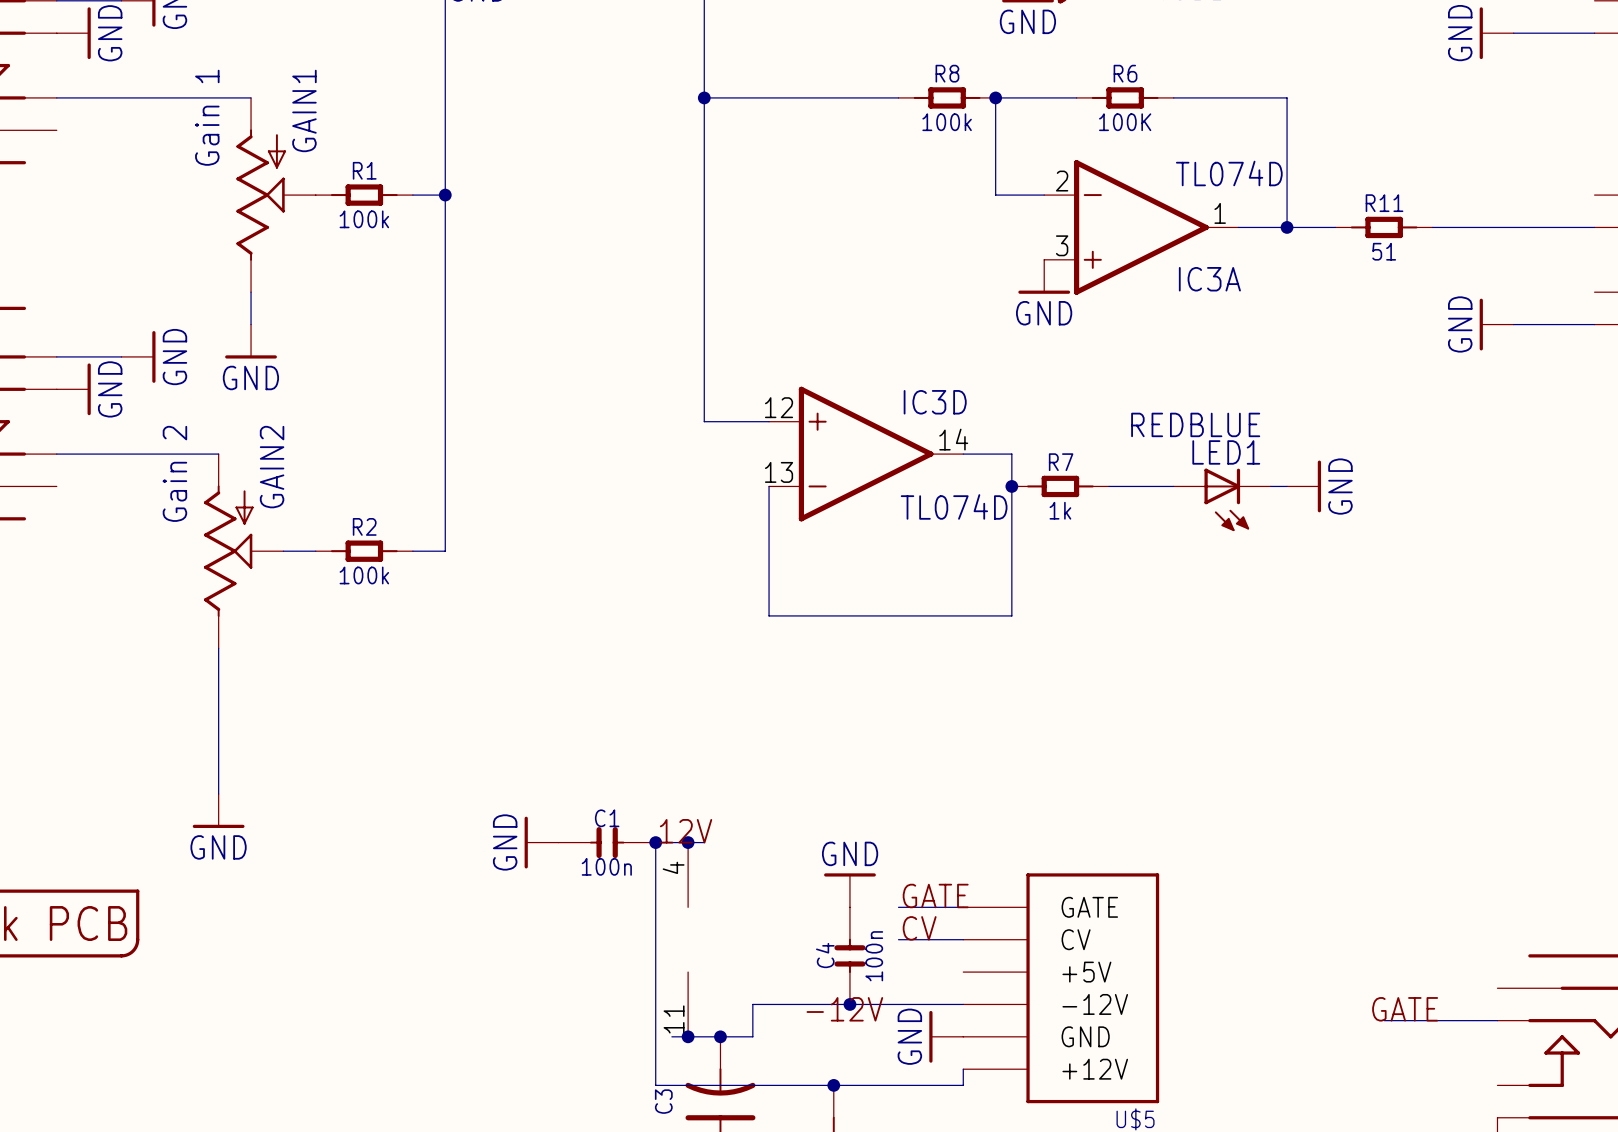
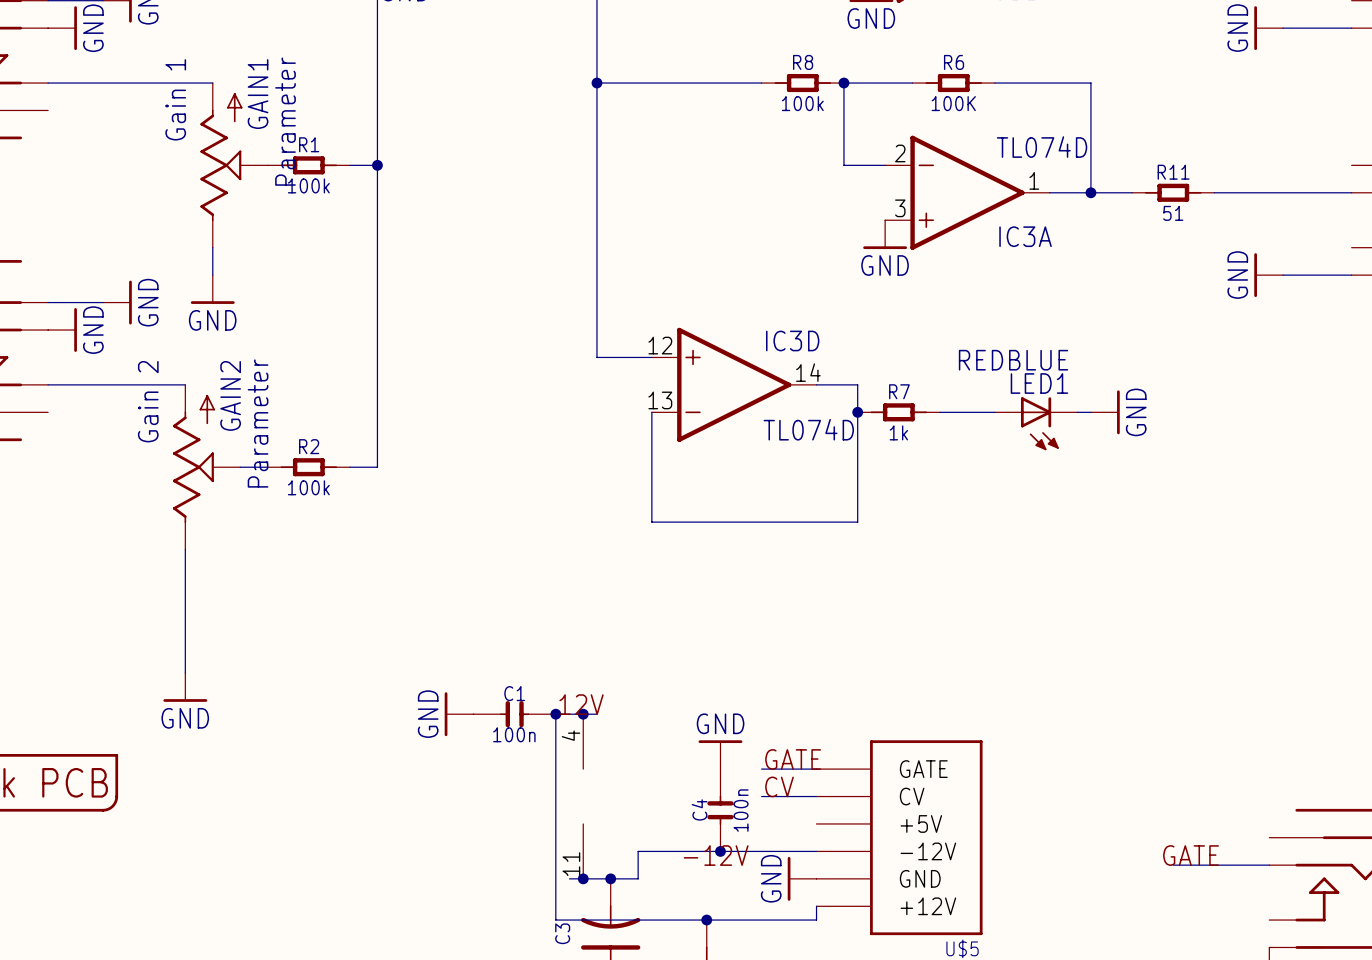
GAIN1 symbol: [236, 97, 316, 293] -> [200, 83, 268, 248]
GAIN1 text: none -> Parameter (285, 121)
GAIN2 symbol: [204, 454, 284, 649] -> [172, 384, 241, 550]
GAIN2 text: none -> Parameter (258, 423)

